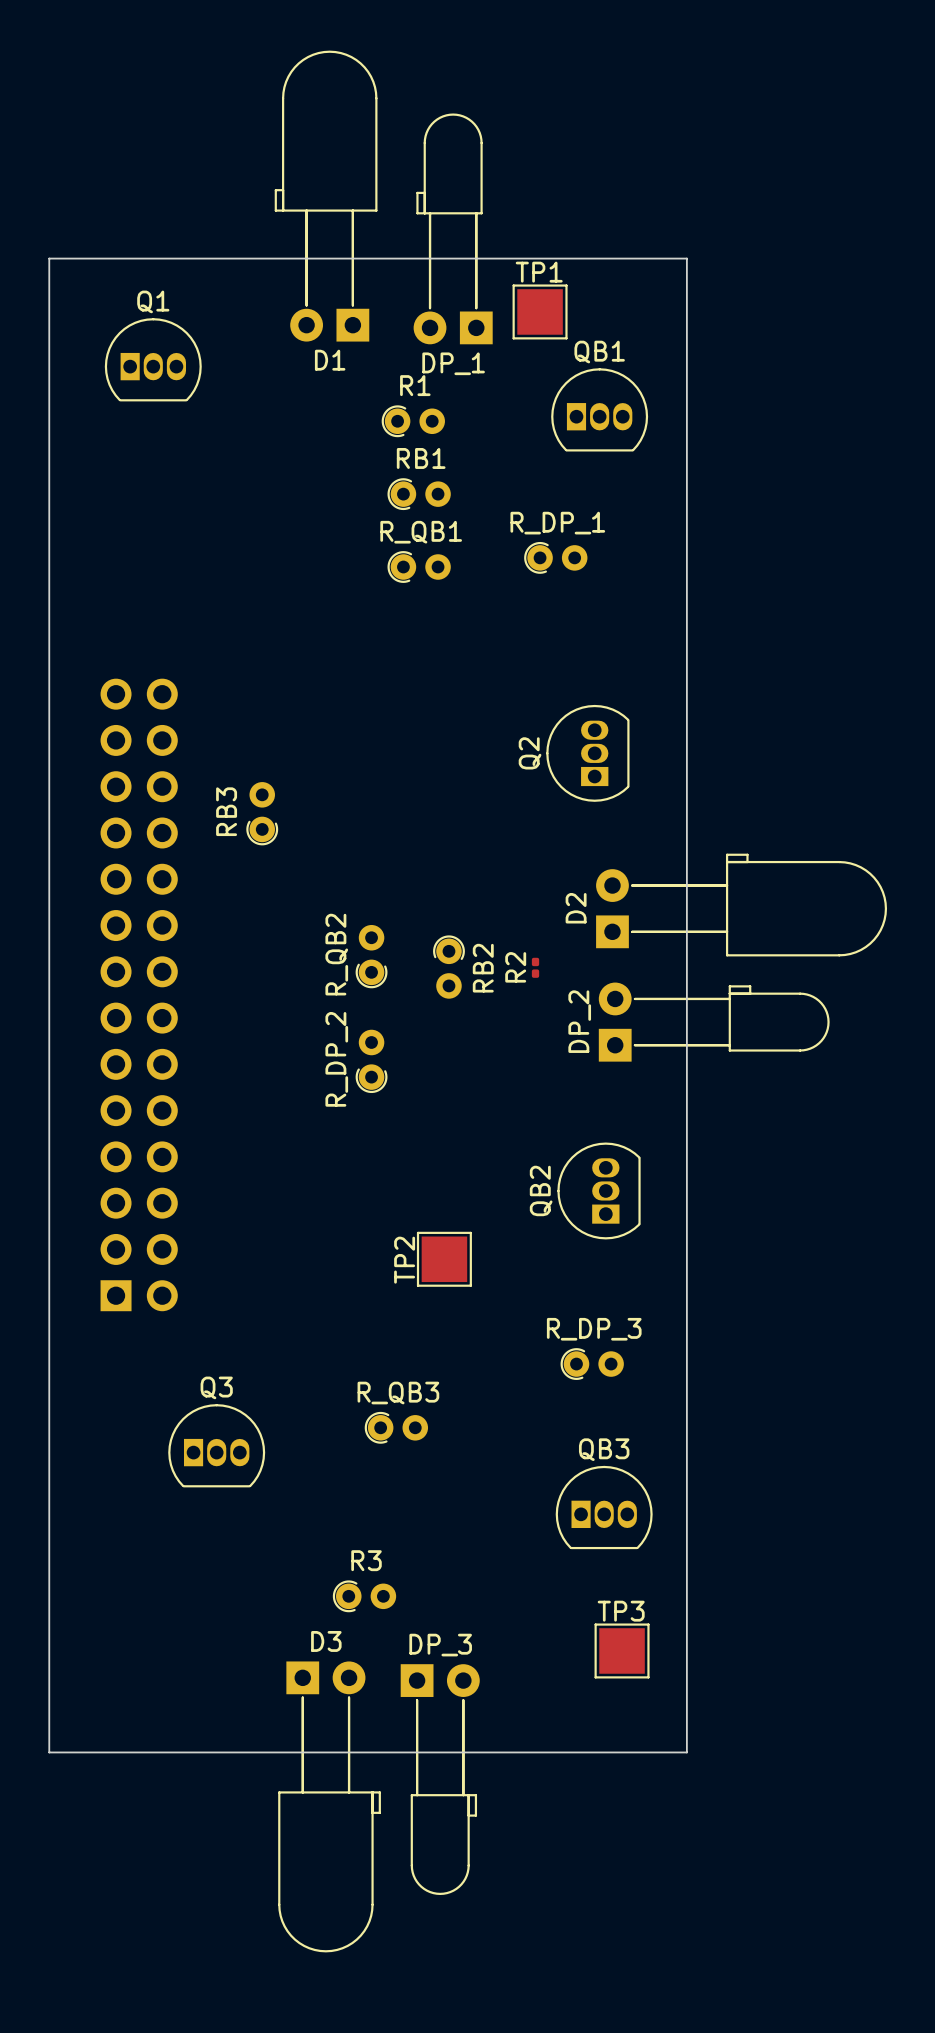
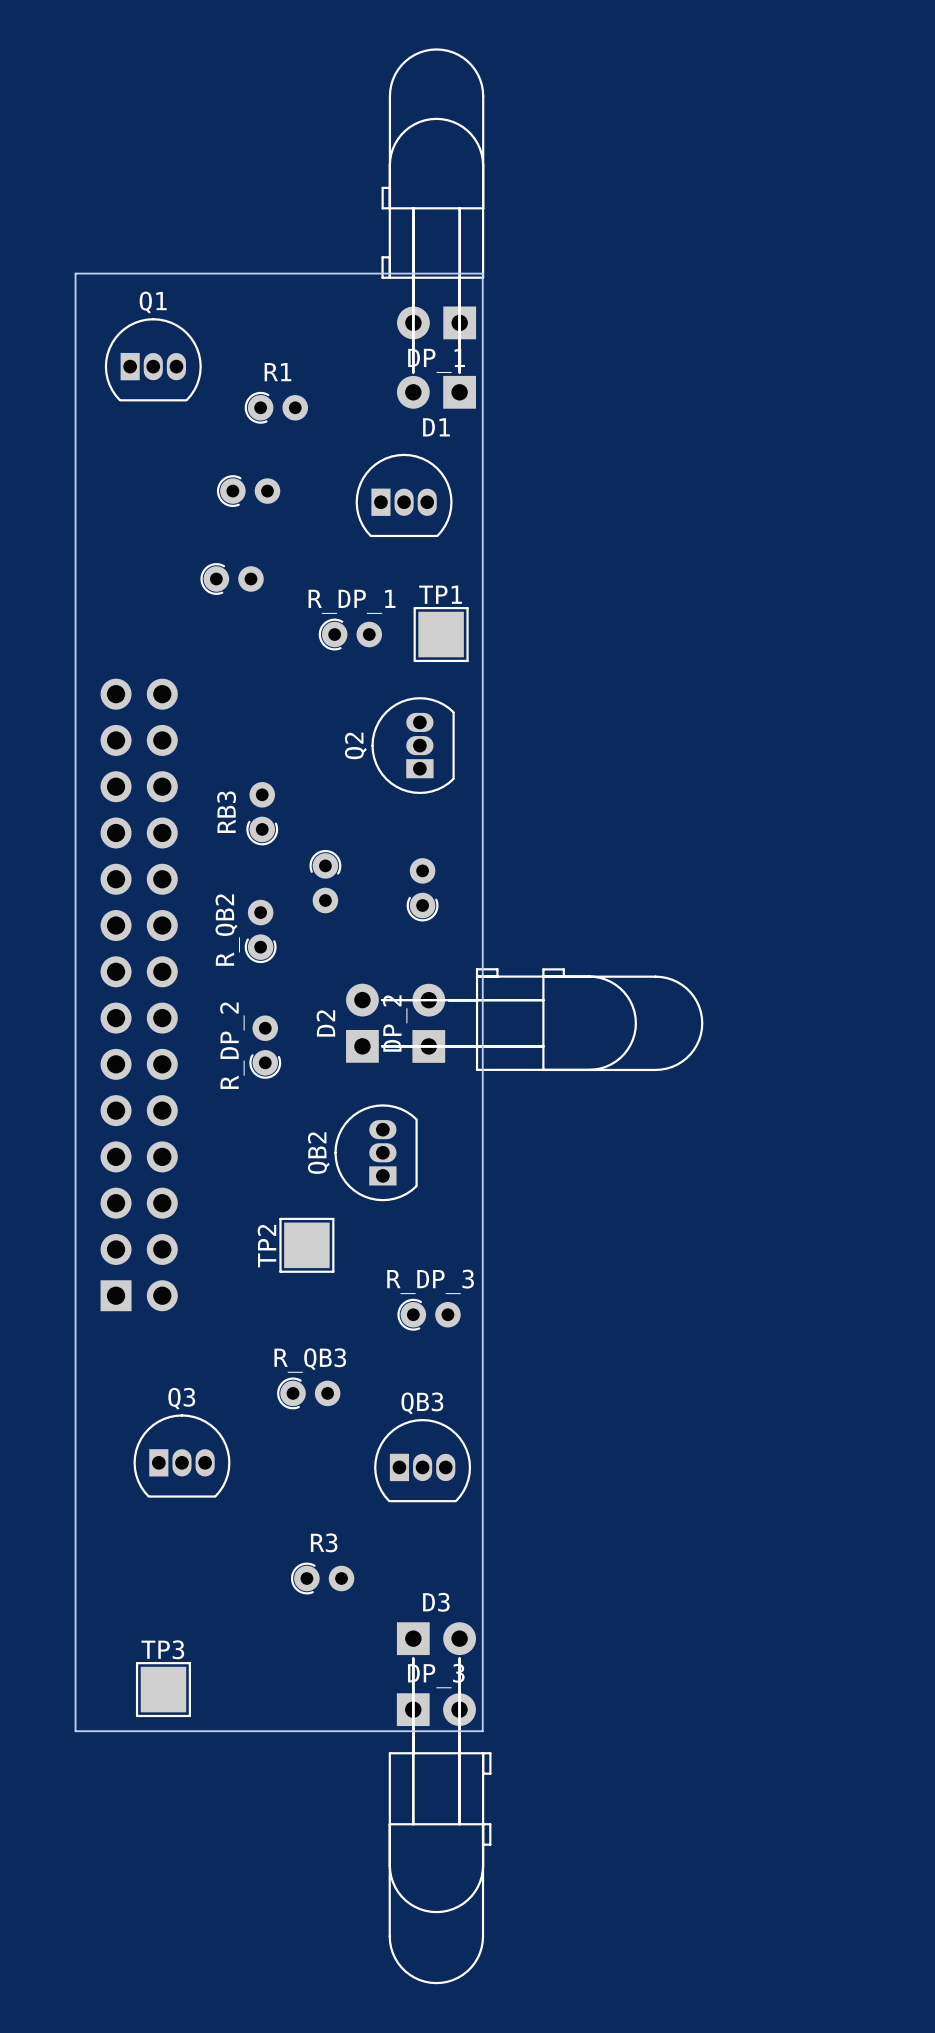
DP_1 footprint: [413, 113, 493, 345] -> [381, 48, 485, 340]
D1 position: (326, 196) -> (432, 263)
board edge: (49, 258) (686, 258) (686, 1752) (49, 1752) (49, 258) -> (75, 273) (75, 1731) (482, 1731) (482, 273) (75, 273)
TP1 position: (540, 311) -> (441, 634)
QB1: (599, 409) -> none
R1 position: (413, 421) -> (276, 407)
part: none -> (248, 491)
RB1: (419, 494) -> none
part: none -> (404, 495)
R_DP_1 position: (555, 557) -> (350, 634)
R_QB1: (419, 567) -> none
part: none -> (232, 578)
Q2 position: (587, 753) -> (413, 745)
part: none -> (325, 881)
part: none -> (422, 889)
D2 position: (741, 905) -> (491, 1019)
R_QB2 position: (371, 956) -> (260, 931)
RB2: (448, 967) -> none
R2: (535, 967) -> none
DP_2 footprint: [598, 982, 830, 1062] -> [412, 968, 704, 1072]
R_DP_2 position: (371, 1061) -> (265, 1047)
QB2 position: (599, 1190) -> (376, 1152)
TP2 position: (444, 1259) -> (306, 1245)
R_DP_3 position: (592, 1364) -> (429, 1314)
R_QB3 position: (396, 1427) -> (308, 1393)
Q3 position: (216, 1445) -> (181, 1455)
QB3 position: (604, 1507) -> (422, 1460)
R3 position: (364, 1596) -> (322, 1578)
TP3 position: (622, 1650) -> (163, 1689)
DP_3 footprint: [400, 1664, 480, 1896] -> [388, 1693, 492, 1985]
D3 position: (329, 1806) -> (440, 1767)

